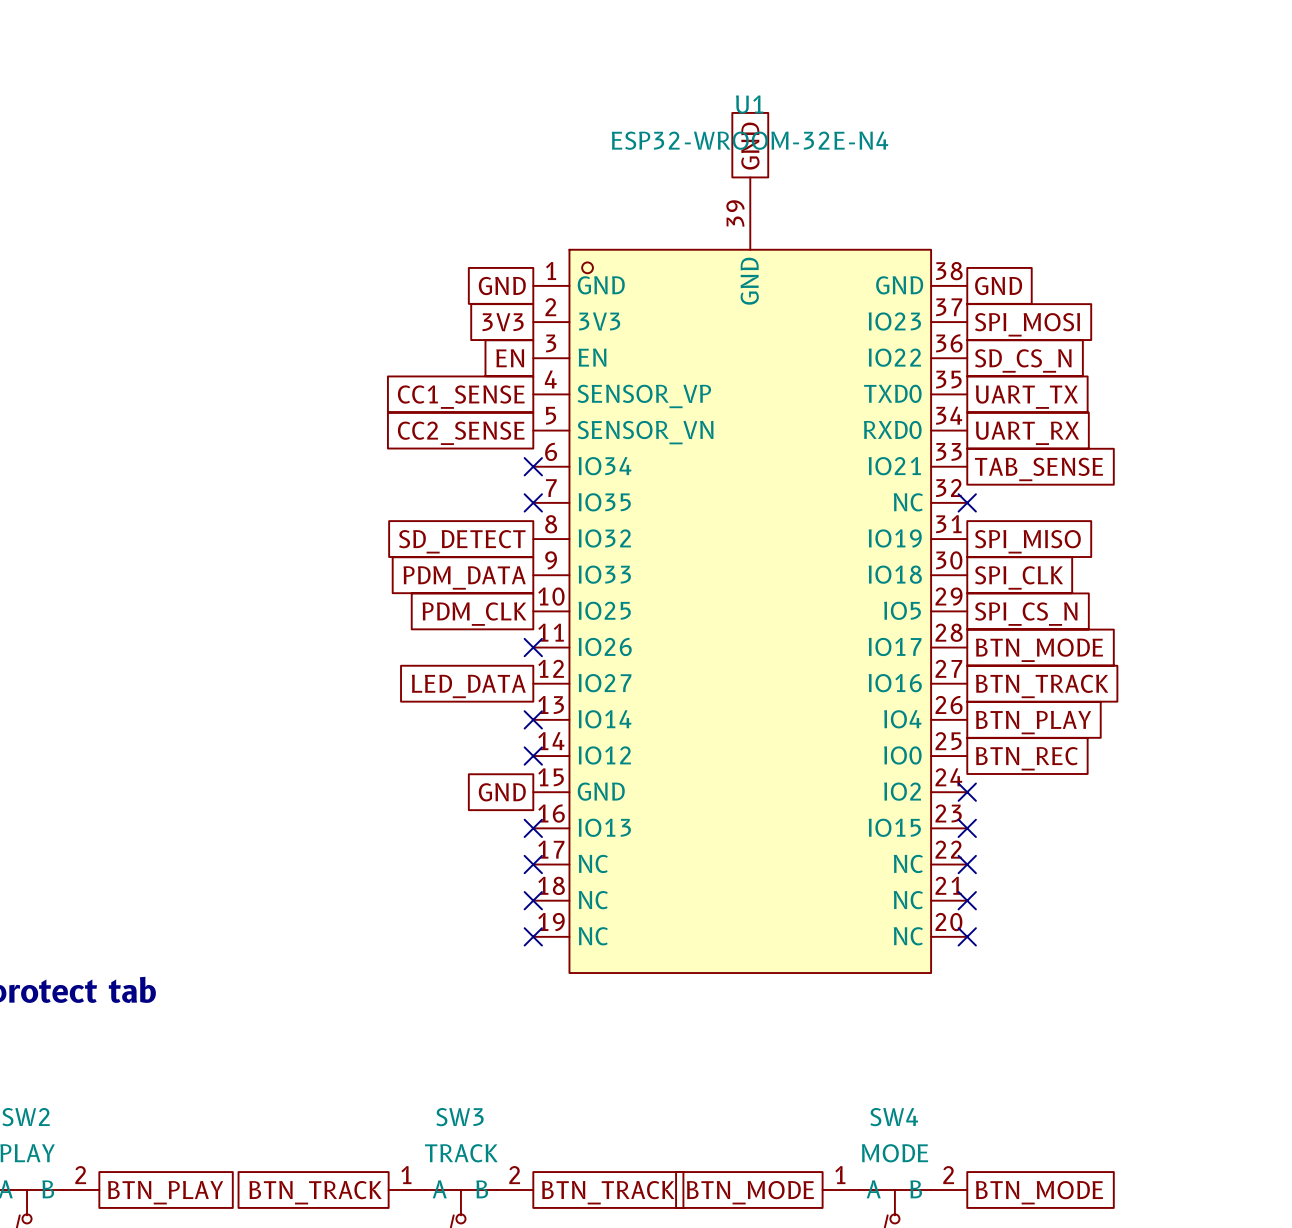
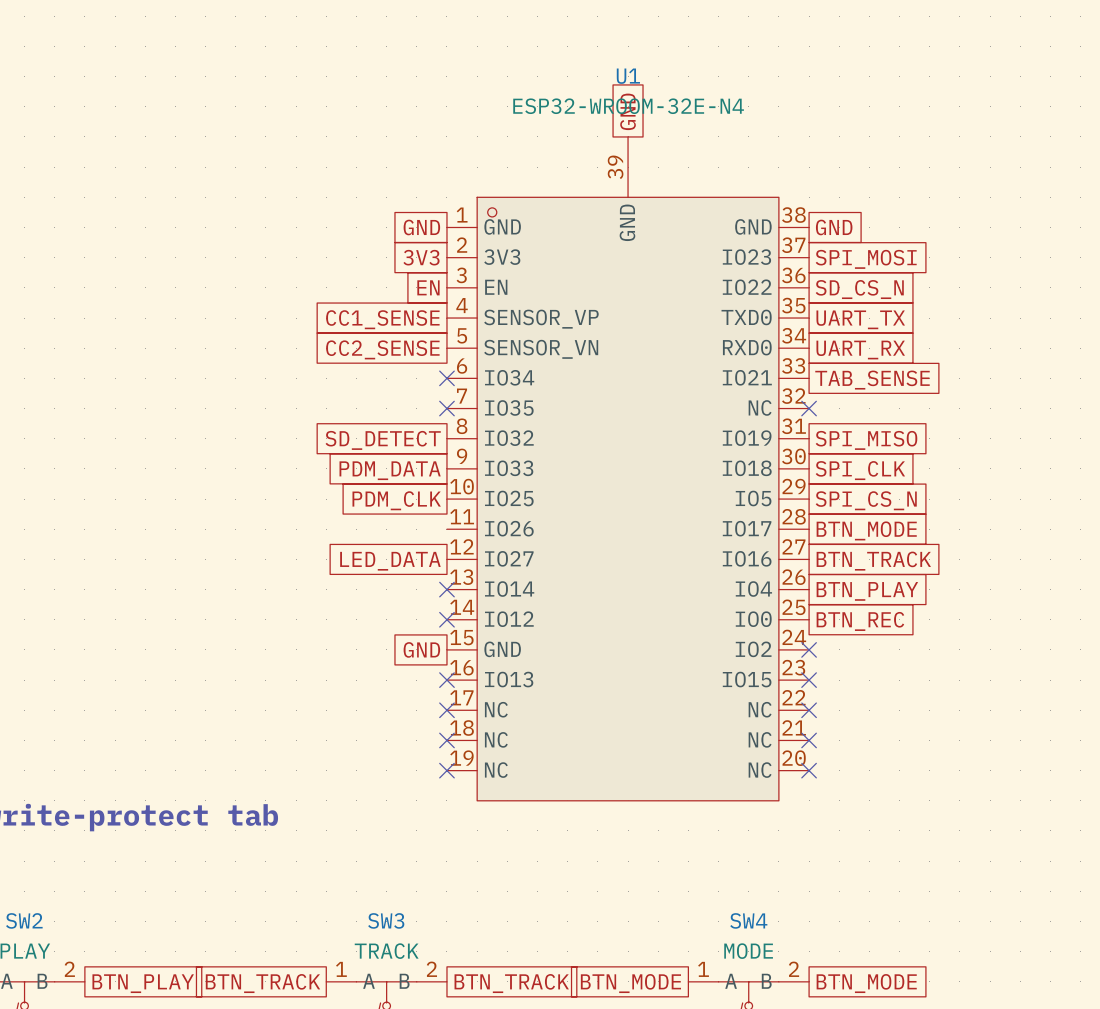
no-connect mark: (533, 647) -> none

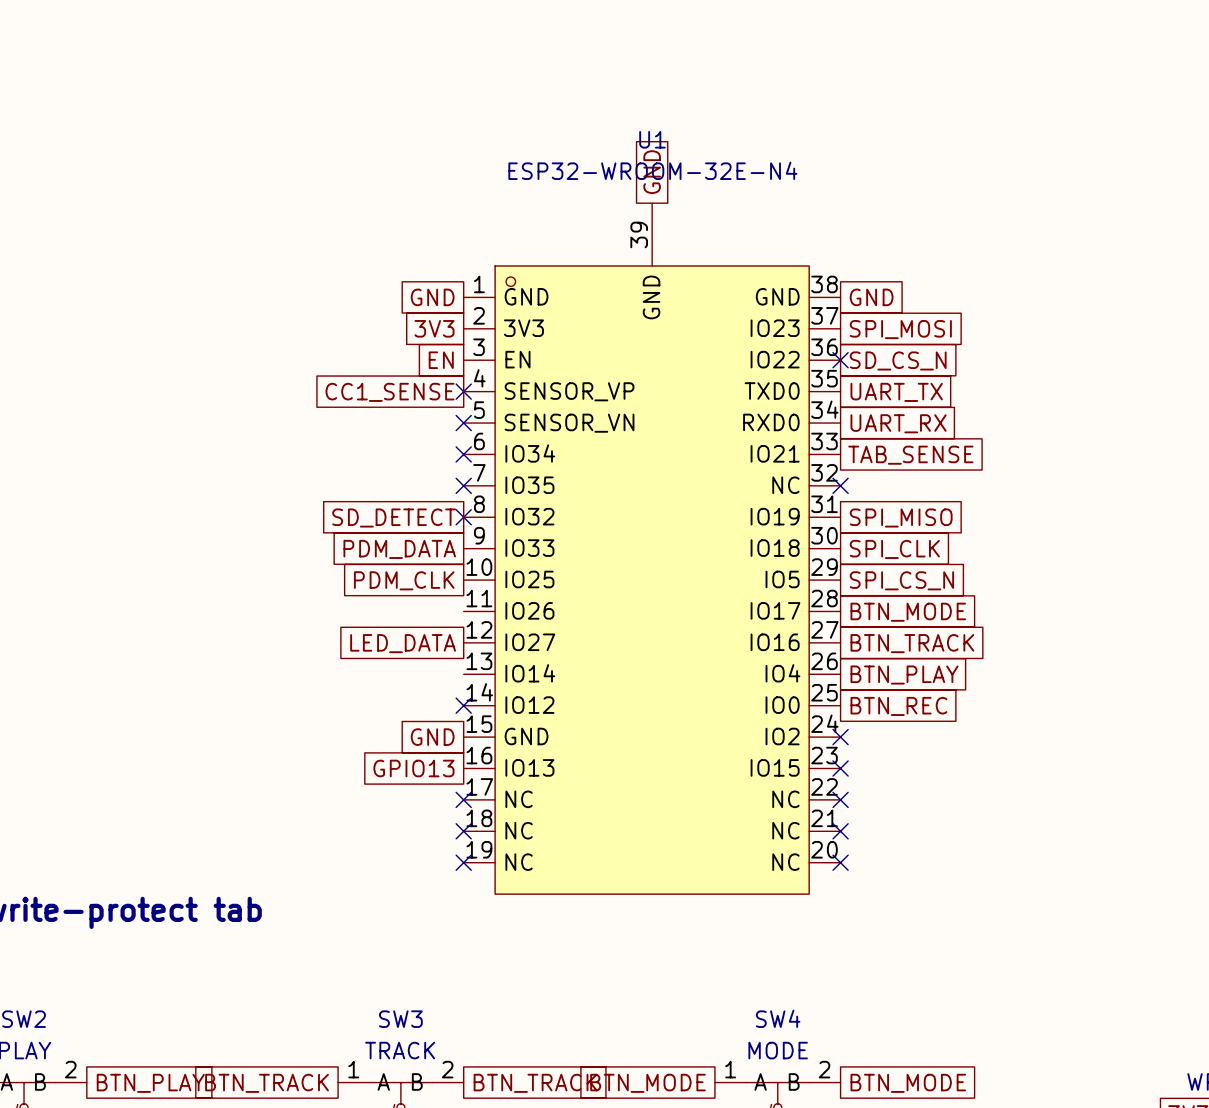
no-connect mark: none -> (840, 360)
no-connect mark: none -> (463, 391)
no-connect mark: none -> (463, 423)
global label: CC2_SENSE (382, 349) -> none
no-connect mark: none -> (463, 517)
no-connect mark: (446, 589) -> none
global label: none -> GPIO13 (413, 768)
no-connect mark: (446, 680) -> none

